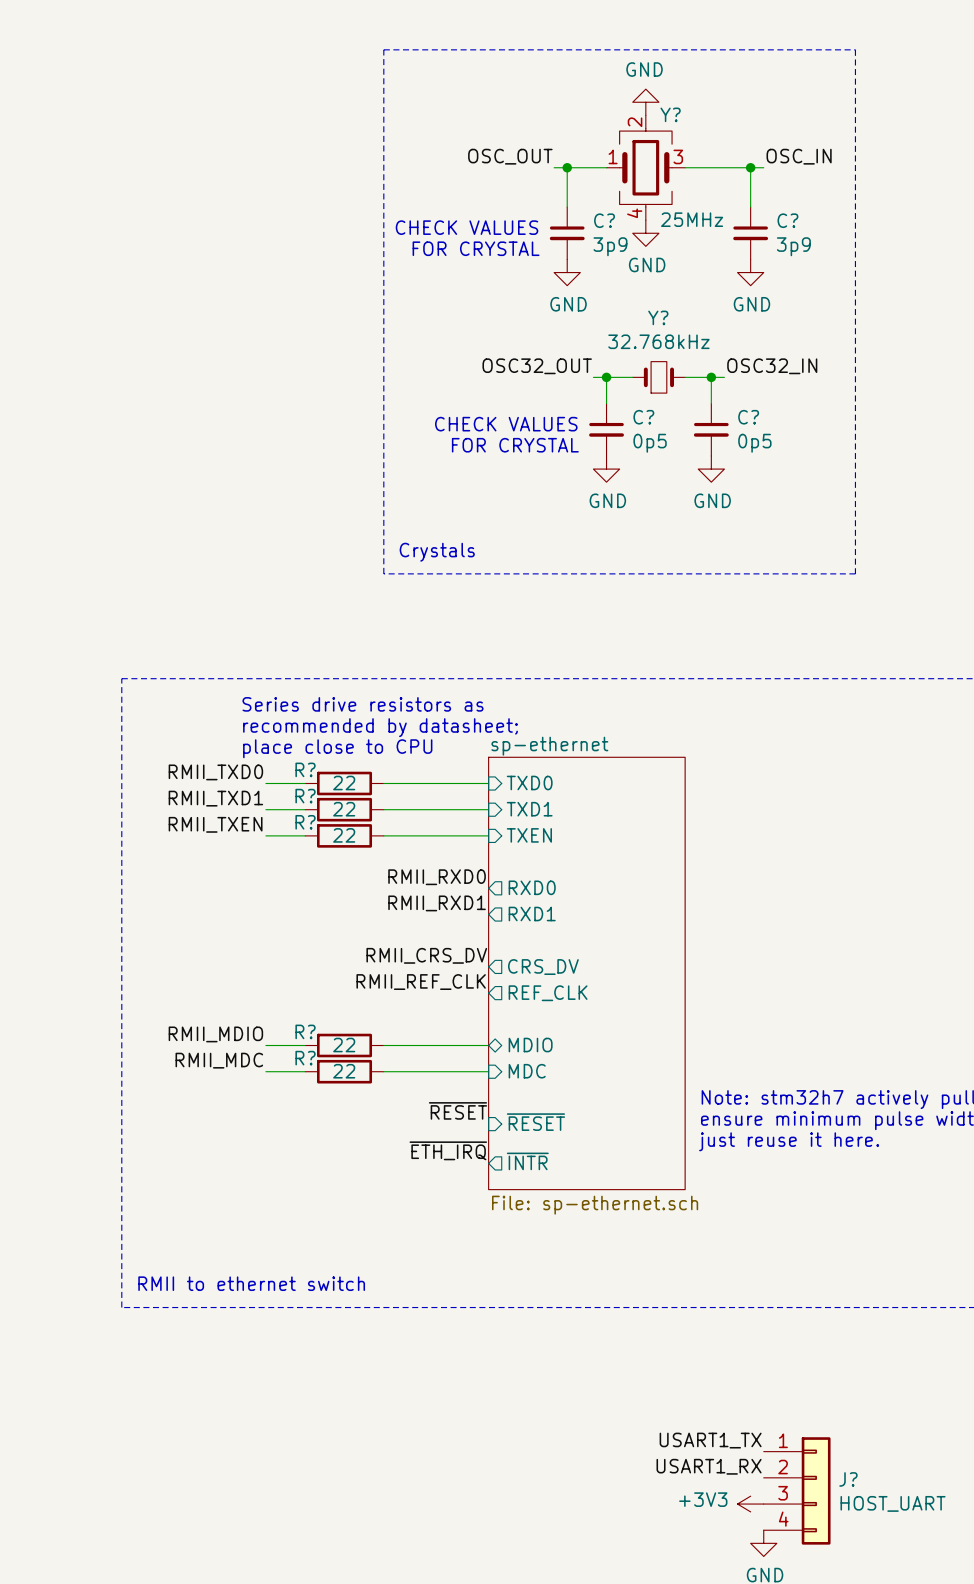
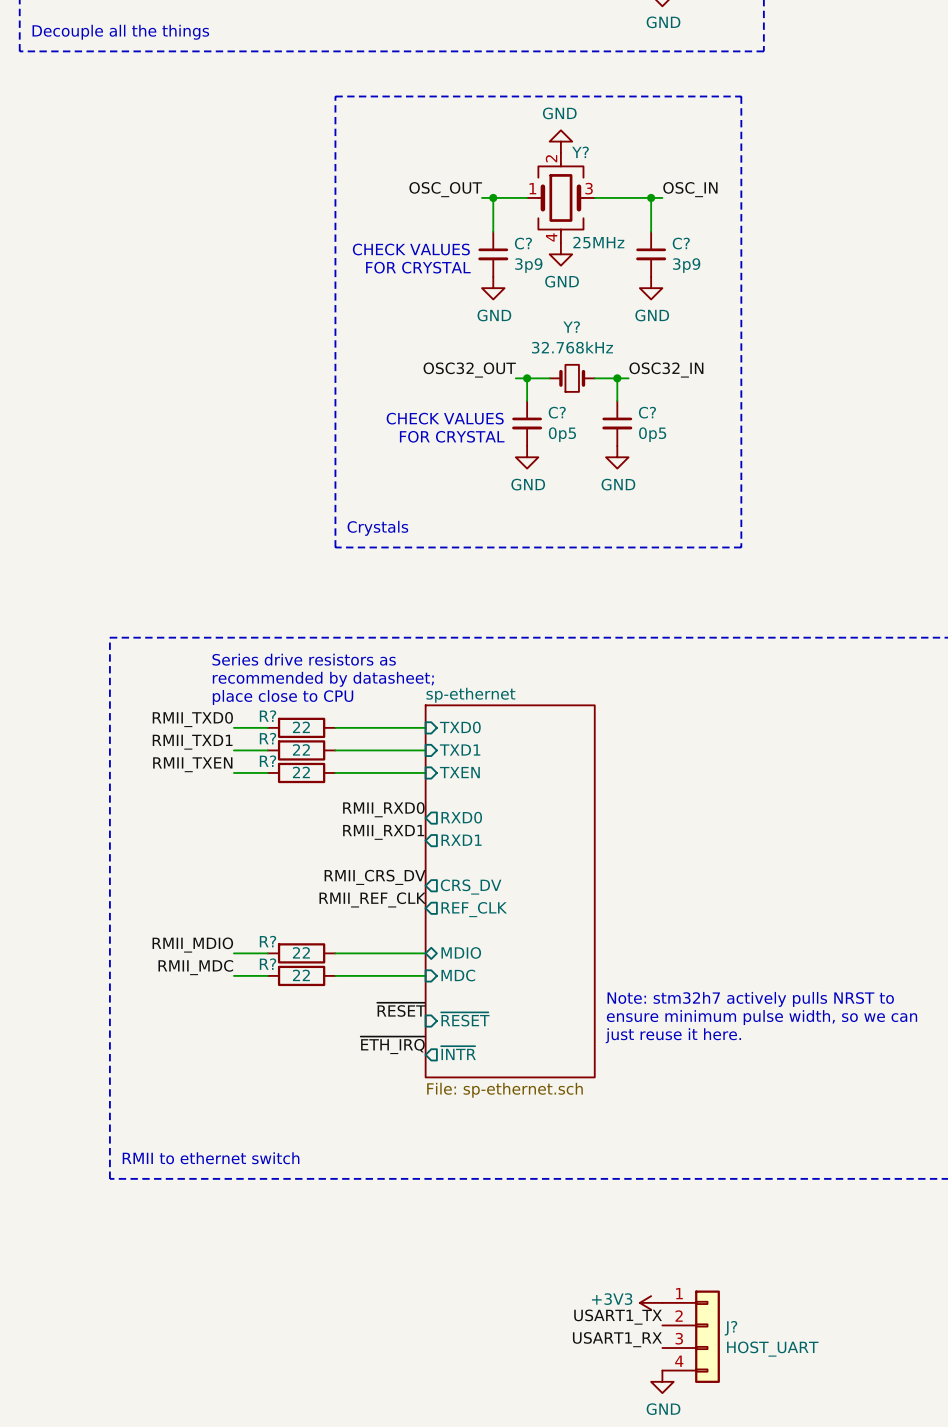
label: USART1_TX (710, 1440) -> none
label: USART1_RX (709, 1466) -> USART1_TX (618, 1317)
label: none -> USART1_RX (617, 1339)
power symbol position: +3V3 (750, 1504) -> +3V3 (651, 1302)

